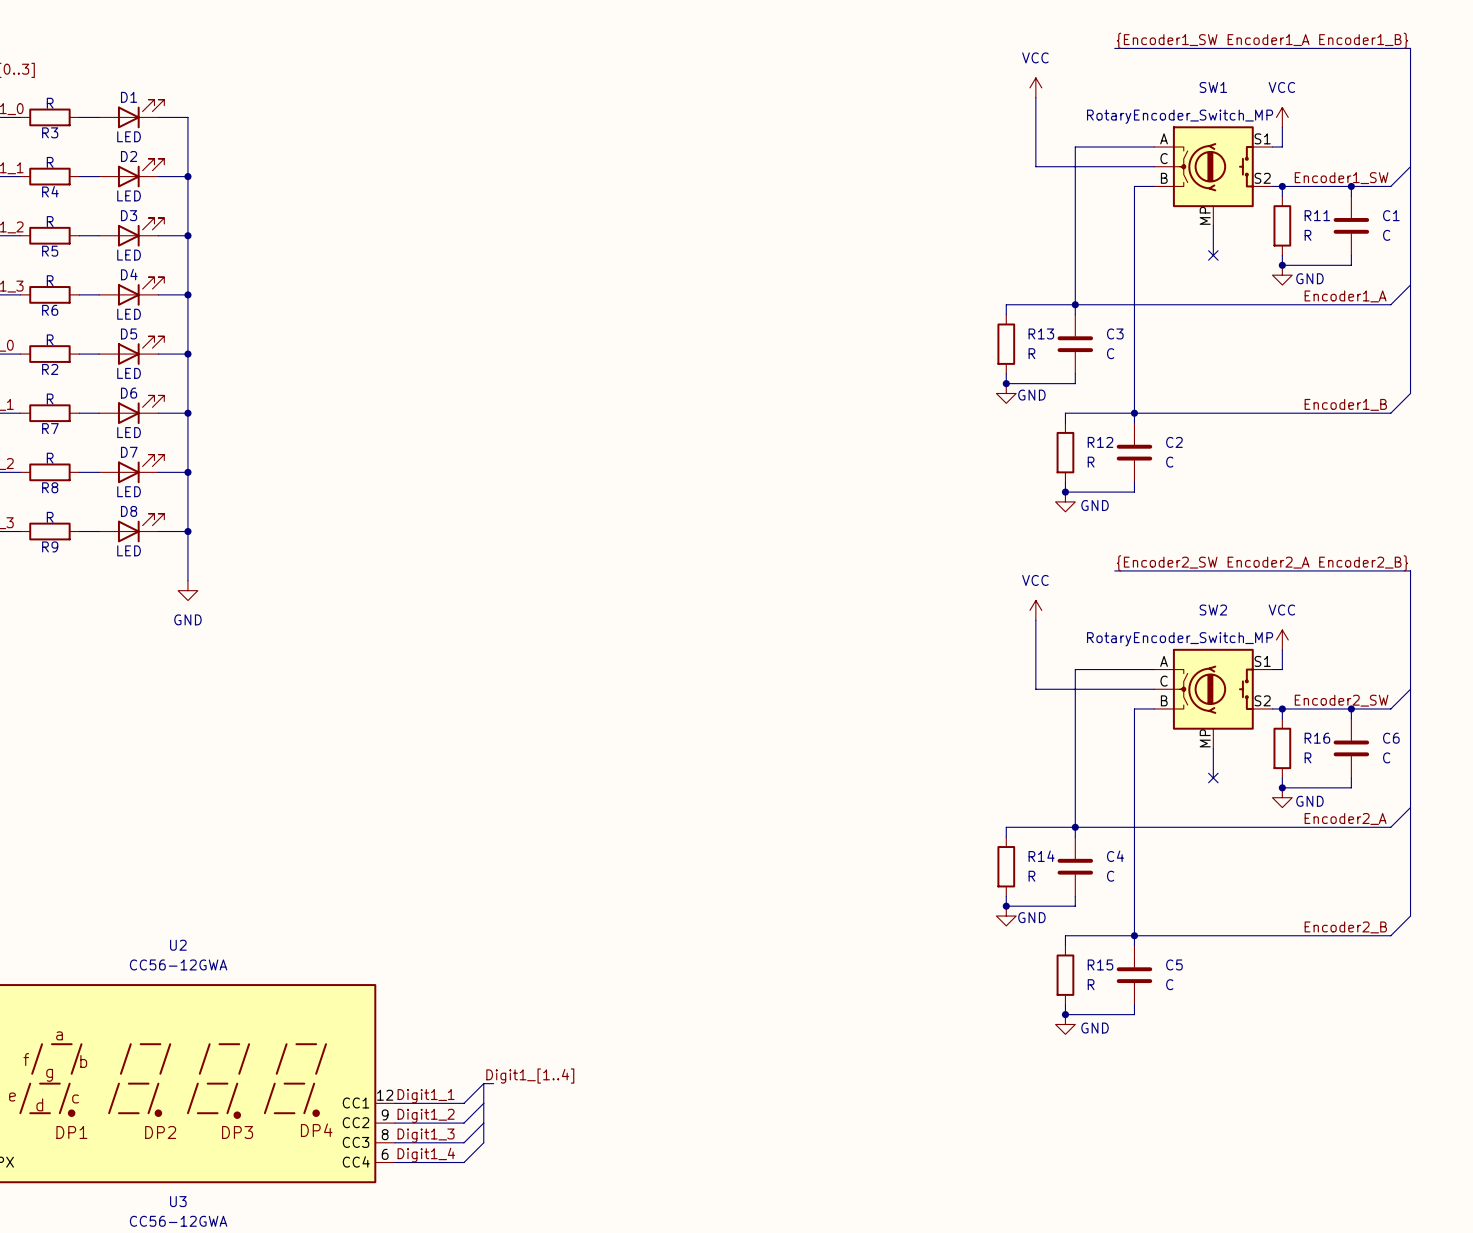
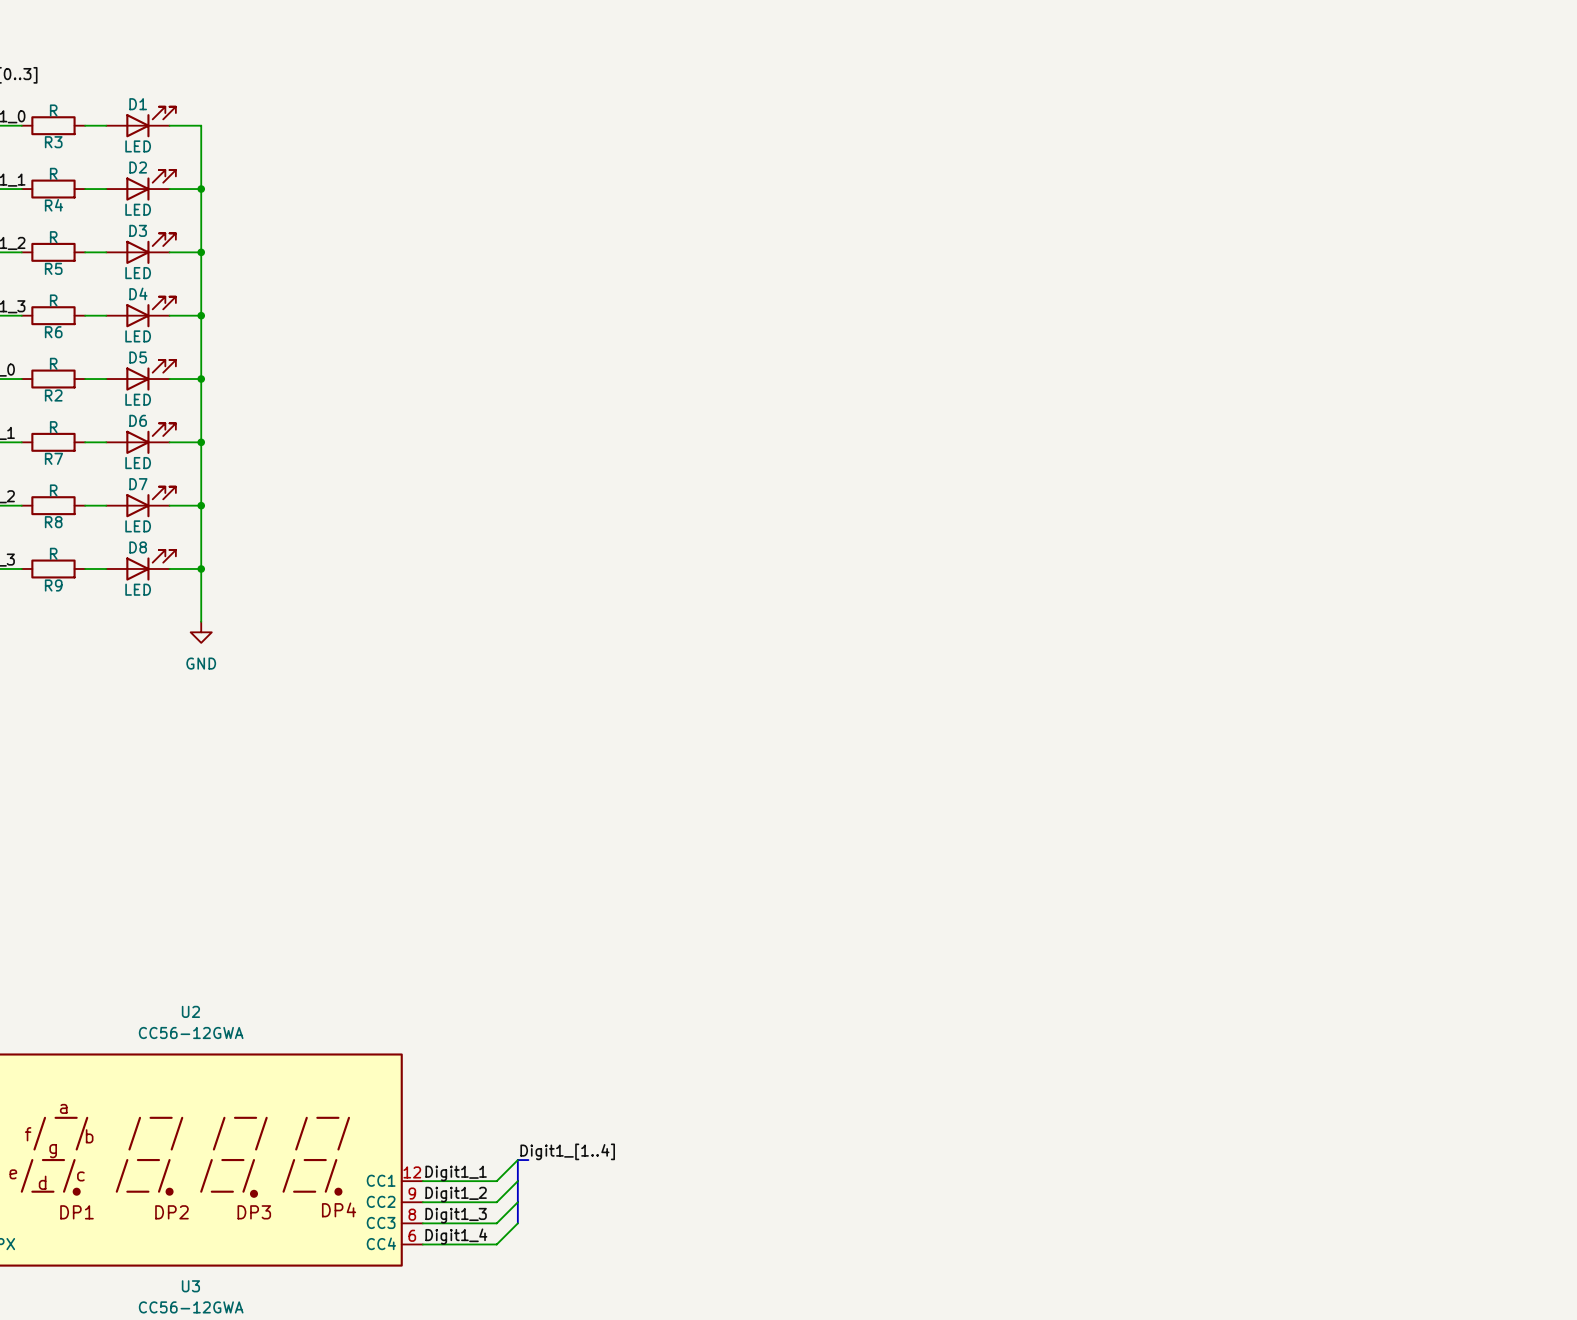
label: {Encoder1_SW Encoder1_A Encoder1_B} (1262, 40) -> none
bus: (1114, 48) (1410, 48) (1410, 393) -> none
power symbol: VCC (1035, 87) -> none
wire: (1035, 97) (1035, 166) (1154, 166) -> none
power symbol: VCC (1282, 117) -> none
wire: (1282, 127) (1282, 147) (1272, 147) -> none
wire: (1154, 147) (1075, 147) (1075, 314) -> none
wire: (1410, 166) (1390, 186) (1272, 186) -> none
SW1: RotaryEncoder_Switch_MP (1213, 176) -> none
label: Encoder1_SW (1341, 178) -> none
wire: (1154, 186) (1134, 186) (1134, 423) -> none
wire: (1282, 186) (1282, 196) -> none
junction: (1282, 186) -> none
wire: (1351, 186) (1351, 196) -> none
junction: (1351, 186) -> none
wire: (1213, 225) (1213, 255) -> none
R11: R (1282, 225) -> none
C1: C (1351, 225) -> none
no-connect mark: (1213, 255) -> none
wire: (1282, 255) (1282, 265) (1351, 265) (1351, 255) -> none
junction: (1282, 265) -> none
power symbol: GND (1282, 275) -> none
wire: (1410, 285) (1390, 304) (1006, 304) (1006, 314) -> none
label: Encoder1_A (1345, 296) -> none
junction: (1075, 304) -> none
R13: R (1006, 344) -> none
C3: C (1075, 344) -> none
wire: (1006, 373) (1006, 383) (1075, 383) (1075, 373) -> none
junction: (1006, 383) -> none
power symbol: GND (1006, 393) -> none
wire: (1410, 393) (1390, 413) (1065, 413) (1065, 423) -> none
label: Encoder1_B (1345, 404) -> none
junction: (1134, 413) -> none
R12: R (1065, 452) -> none
C2: C (1134, 452) -> none
wire: (1065, 482) (1065, 492) (1134, 492) (1134, 482) -> none
junction: (1065, 492) -> none
power symbol: GND (1065, 501) -> none
label: {Encoder2_SW Encoder2_A Encoder2_B} (1262, 563) -> none
bus: (1114, 570) (1410, 570) (1410, 916) -> none
power symbol: VCC (1035, 610) -> none
wire: (1035, 620) (1035, 689) (1154, 689) -> none
power symbol: VCC (1282, 639) -> none
wire: (1282, 649) (1282, 669) (1272, 669) -> none
wire: (1154, 669) (1075, 669) (1075, 837) -> none
wire: (1410, 689) (1390, 708) (1272, 708) -> none
SW2: RotaryEncoder_Switch_MP (1213, 698) -> none
label: Encoder2_SW (1341, 700) -> none
wire: (1154, 708) (1134, 708) (1134, 945) -> none
wire: (1282, 708) (1282, 718) -> none
junction: (1282, 708) -> none
wire: (1351, 708) (1351, 718) -> none
junction: (1351, 708) -> none
wire: (1213, 748) (1213, 778) -> none
R16: R (1282, 748) -> none
C6: C (1351, 748) -> none
no-connect mark: (1213, 778) -> none
wire: (1282, 778) (1282, 787) (1351, 787) (1351, 778) -> none
junction: (1282, 787) -> none
power symbol: GND (1282, 797) -> none
wire: (1410, 807) (1390, 827) (1006, 827) (1006, 837) -> none
label: Encoder2_A (1345, 818) -> none
junction: (1075, 827) -> none
R14: R (1006, 866) -> none
C4: C (1075, 866) -> none
wire: (1006, 896) (1006, 906) (1075, 906) (1075, 896) -> none
junction: (1006, 906) -> none
power symbol: GND (1006, 916) -> none
wire: (1410, 916) (1390, 935) (1065, 935) (1065, 945) -> none
label: Encoder2_B (1345, 927) -> none
junction: (1134, 935) -> none
R15: R (1065, 975) -> none
C5: C (1134, 975) -> none
wire: (1065, 1004) (1065, 1014) (1134, 1014) (1134, 1004) -> none
junction: (1065, 1014) -> none
power symbol: GND (1065, 1024) -> none

